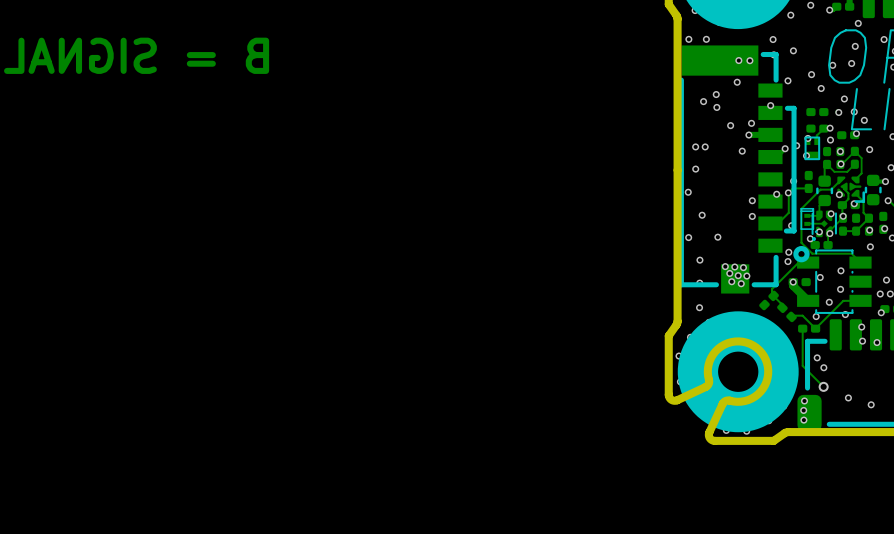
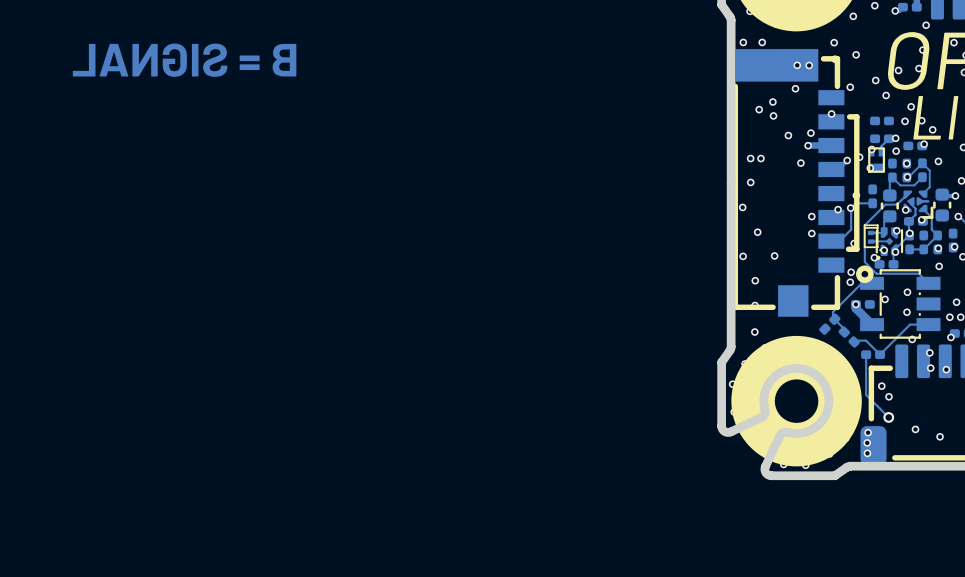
via: (725, 266) -> none
via: (734, 267) -> none
via: (743, 267) -> none
via: (729, 273) -> none
via: (738, 275) -> none
via: (746, 276) -> none
via: (731, 281) -> none
via: (741, 283) -> none
via: (829, 302) -> none
via: (816, 316) -> none

